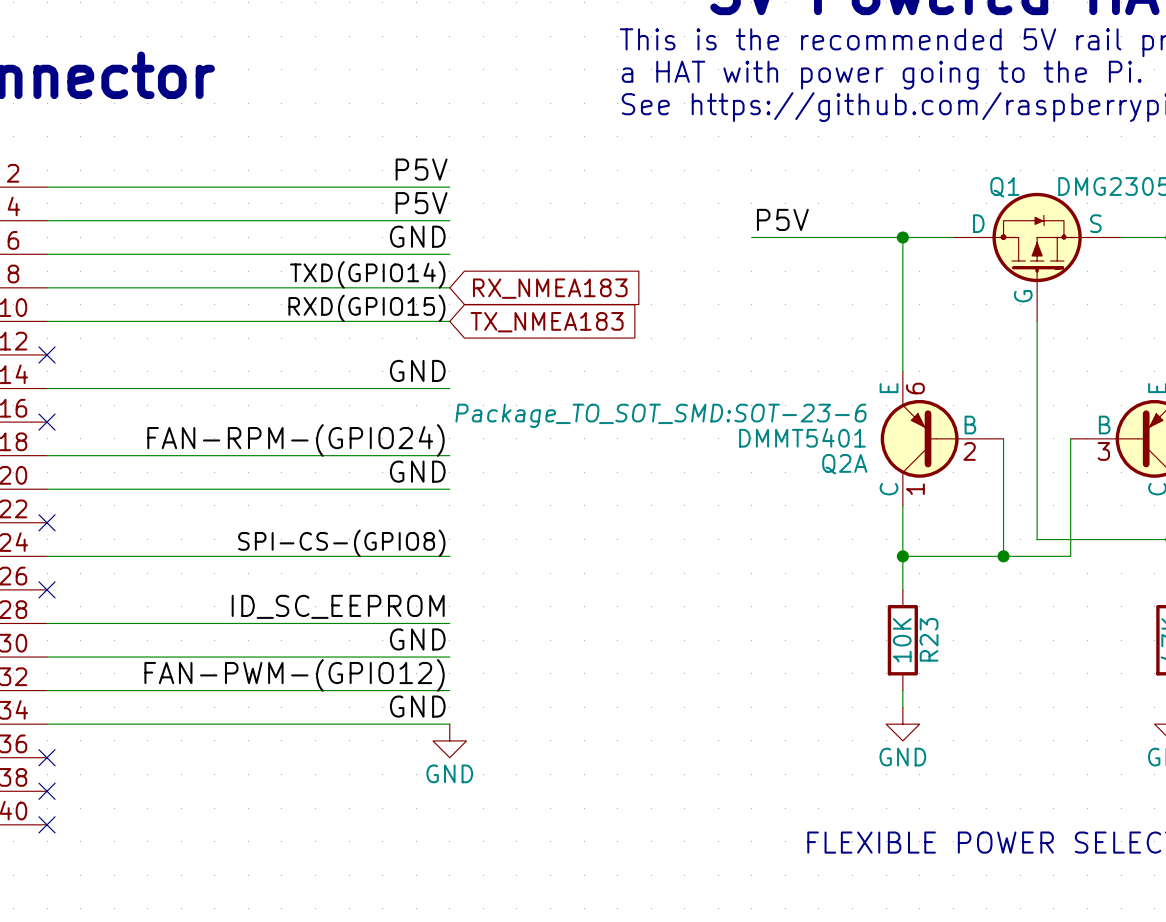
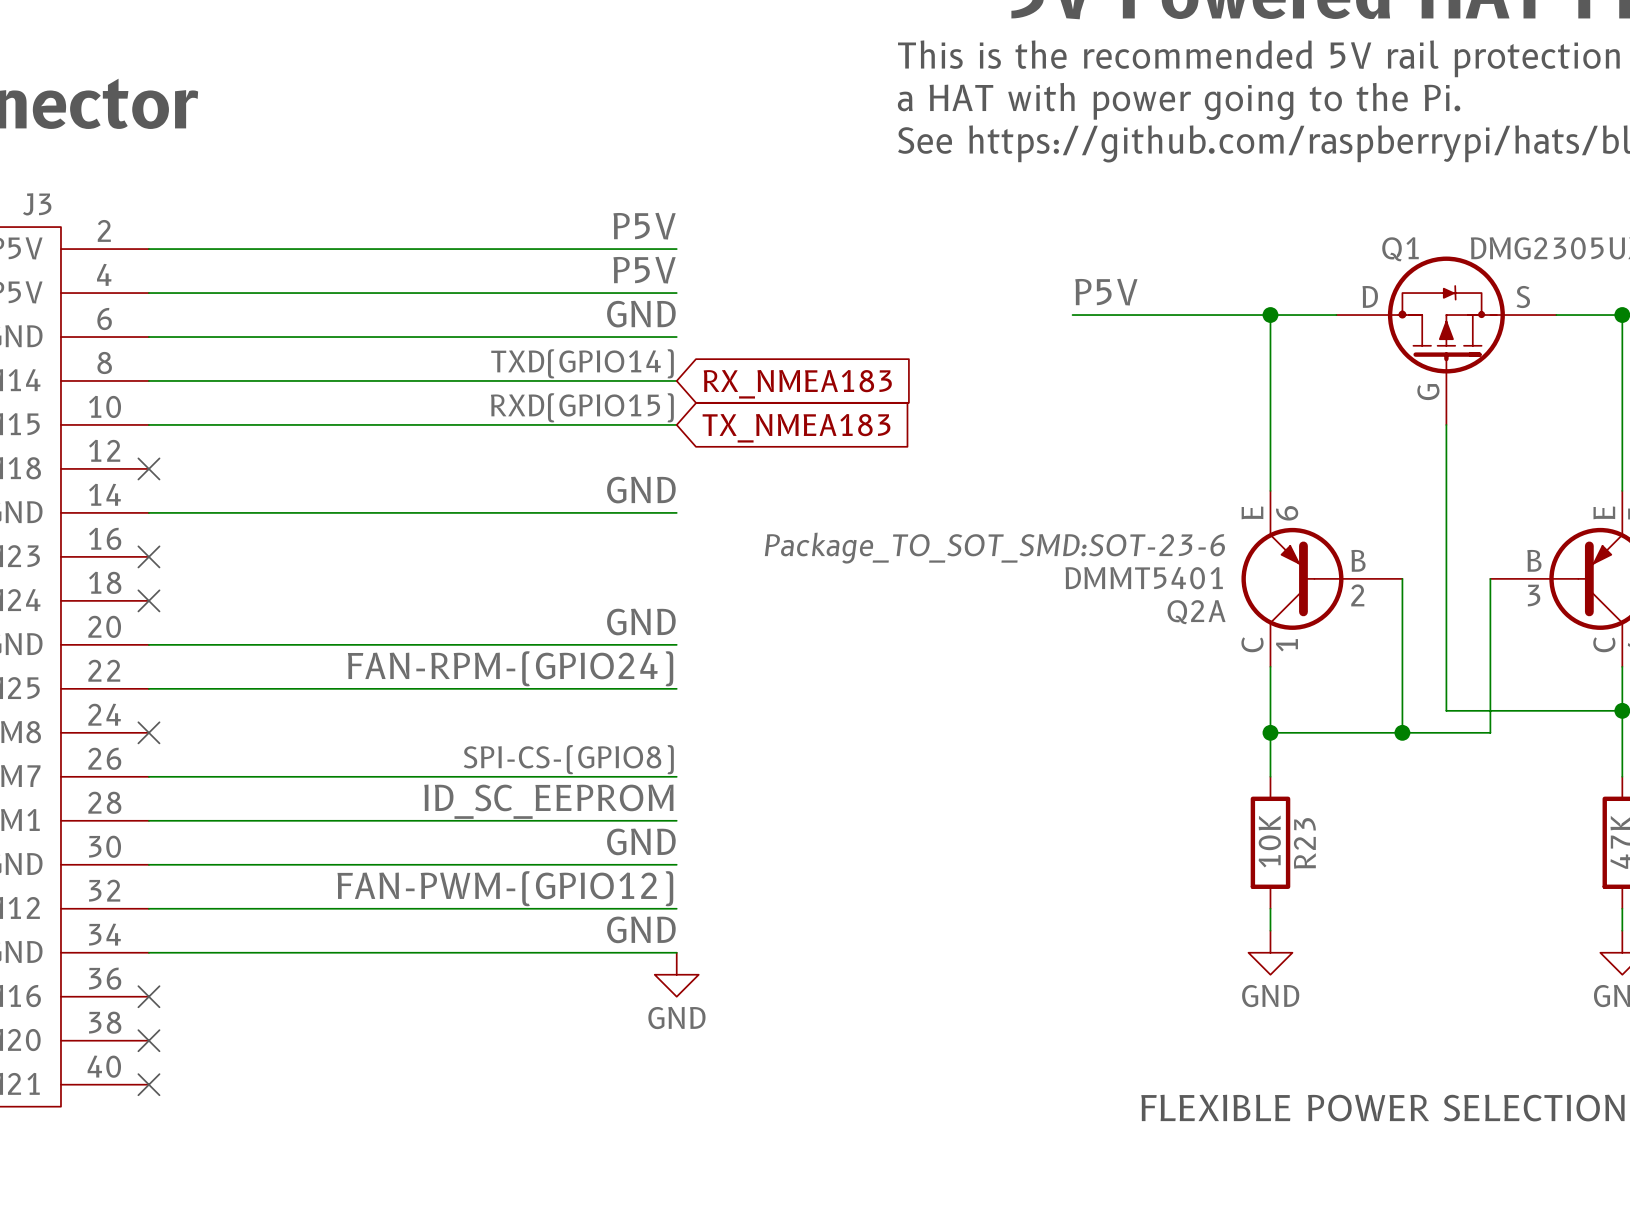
label position: FAN-RPM-(GPIO24) (295, 440) -> FAN-RPM-(GPIO24) (510, 668)
wire: (47, 455) (449, 455) -> (148, 688) (676, 688)
no-connect mark: none -> (148, 600)
no-connect mark: (47, 522) -> none
label position: SPI-CS-(GPIO8) (341, 543) -> SPI-CS-(GPIO8) (568, 759)
wire: (47, 556) (449, 556) -> (148, 776) (676, 776)
no-connect mark: none -> (148, 732)
no-connect mark: (47, 589) -> none

